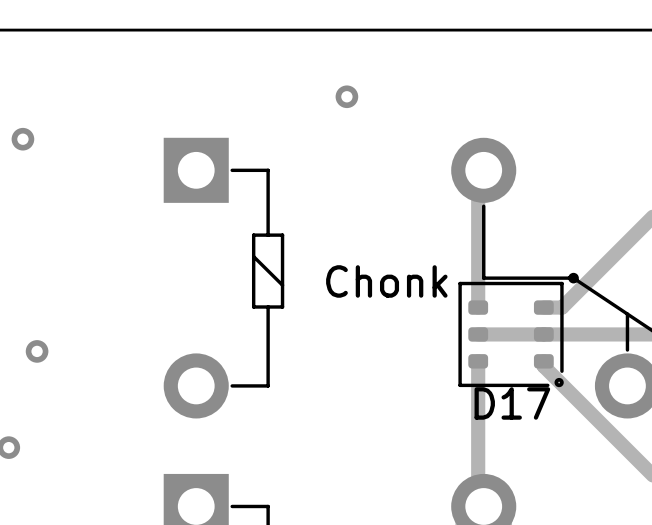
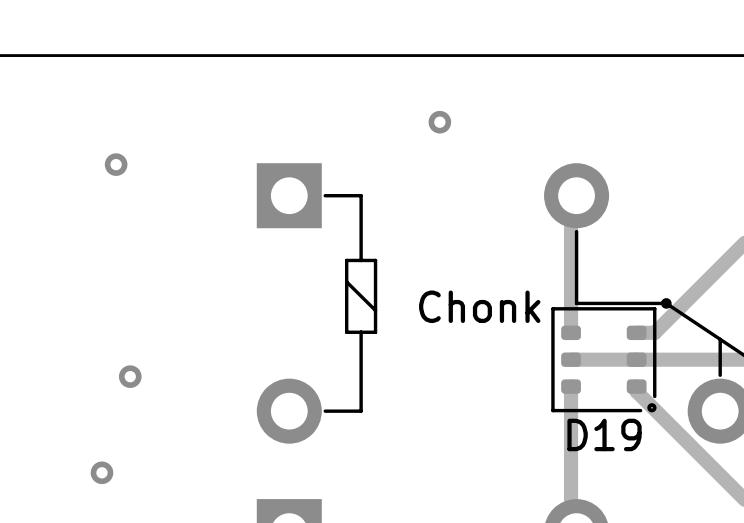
D17 name: D17 (512, 403) -> D19 (604, 434)

